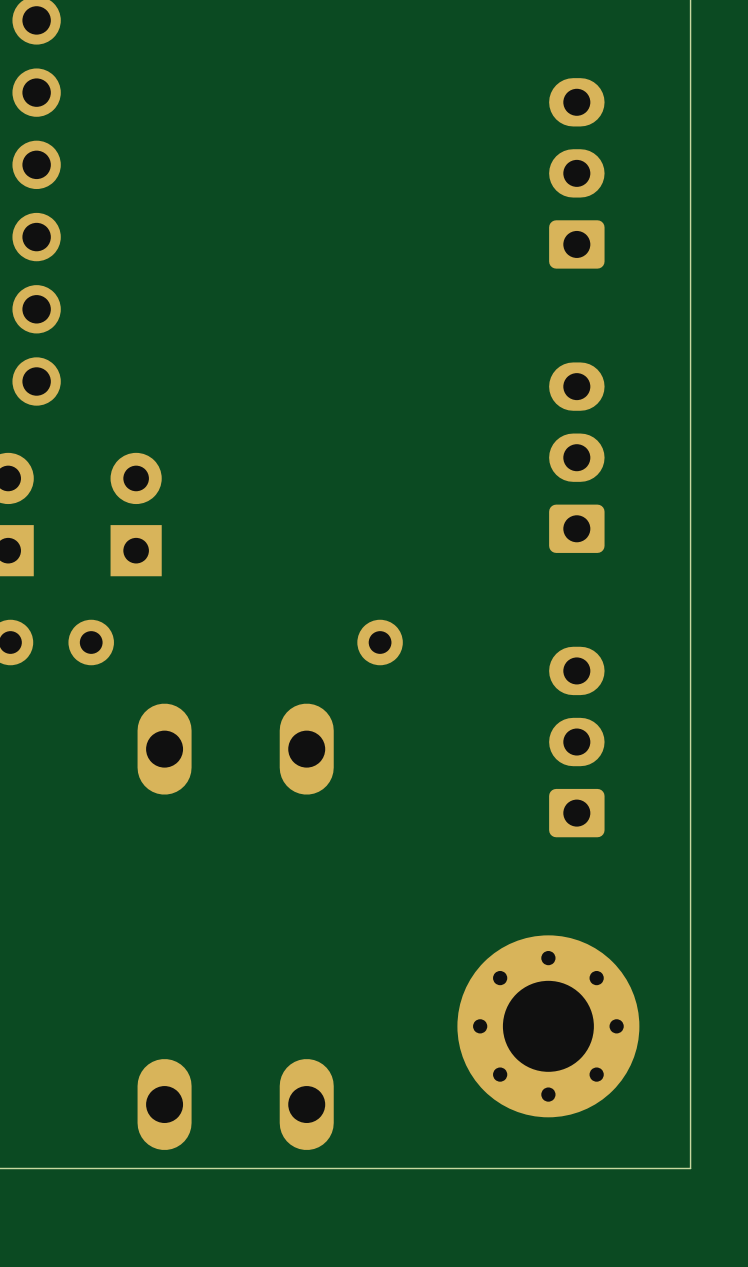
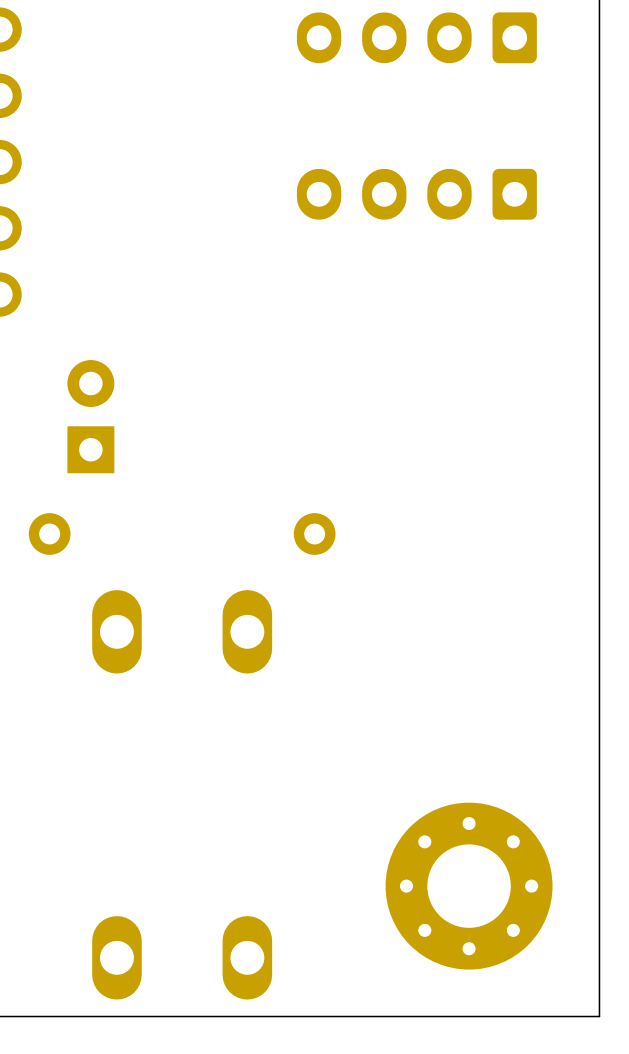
part: none -> (416, 37)
part: (576, 173) -> none
part: none -> (416, 194)
part: (576, 457) -> none
part: (576, 742) -> none

